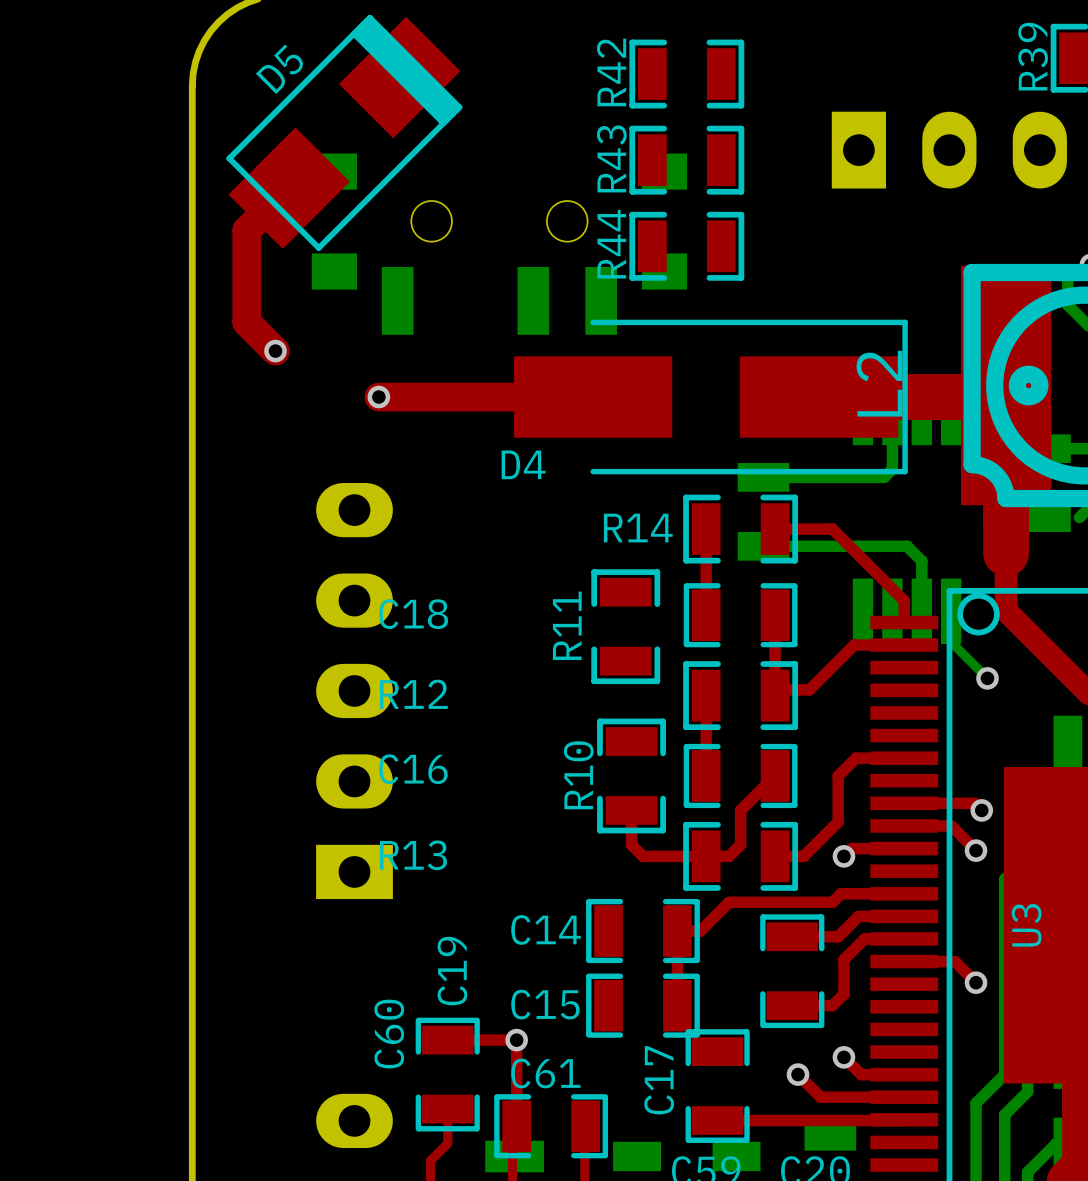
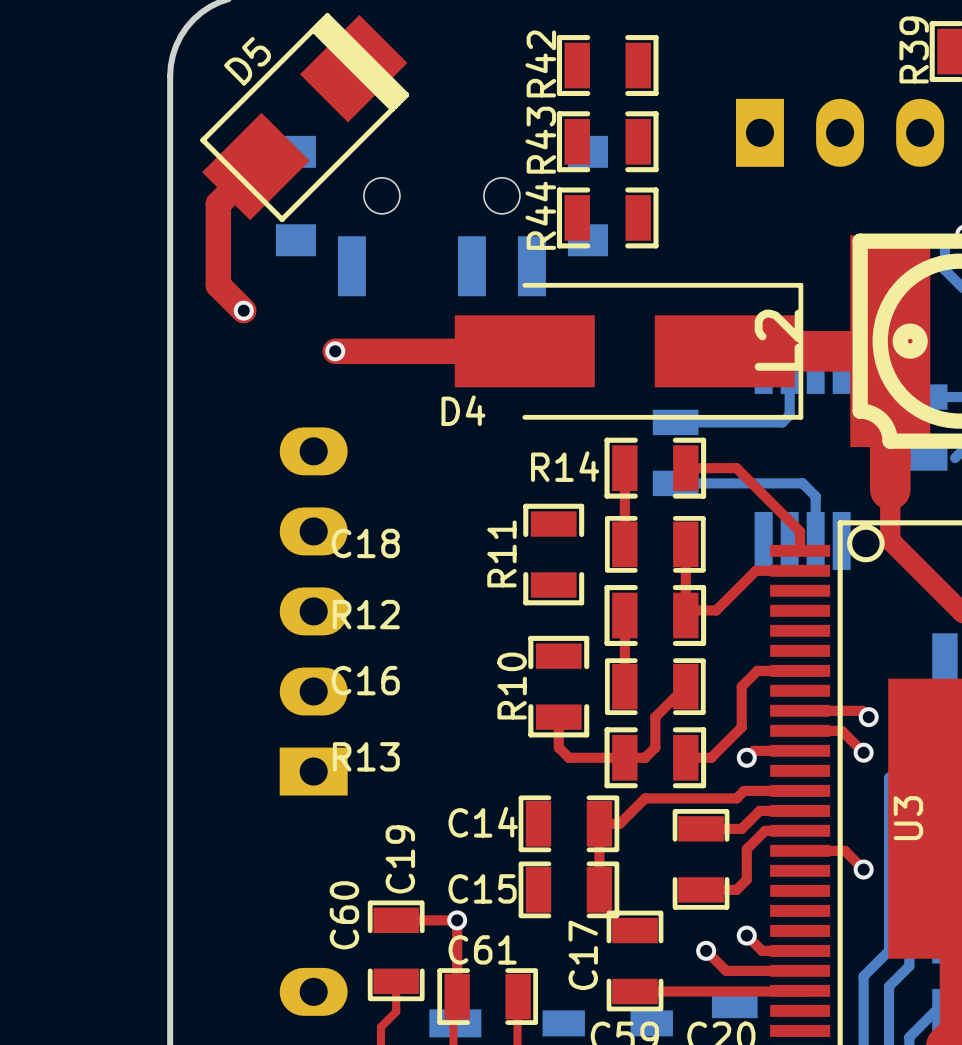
bottom track: (951, 611) (951, 642) (987, 678) -> none
via: (987, 678) -> none

